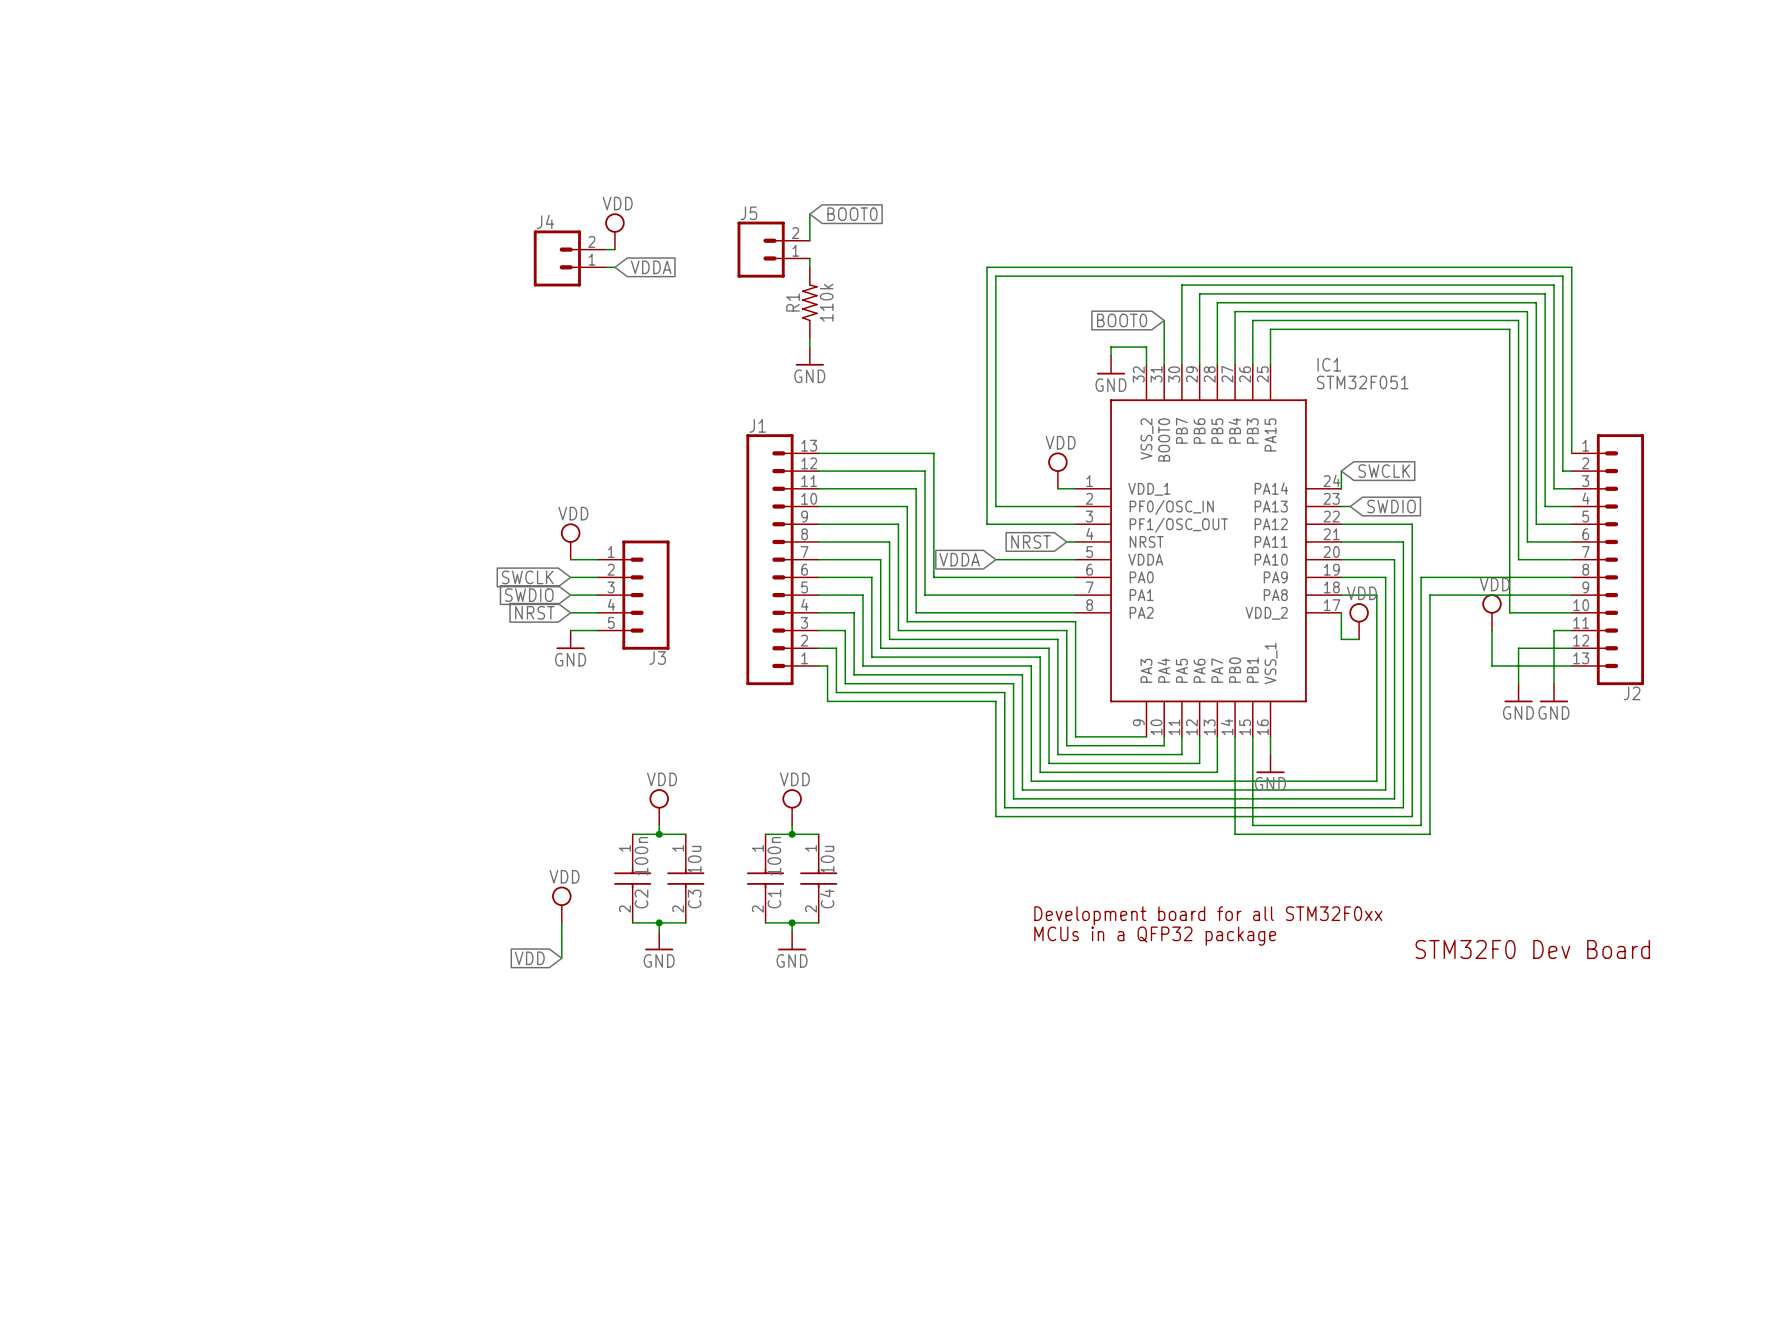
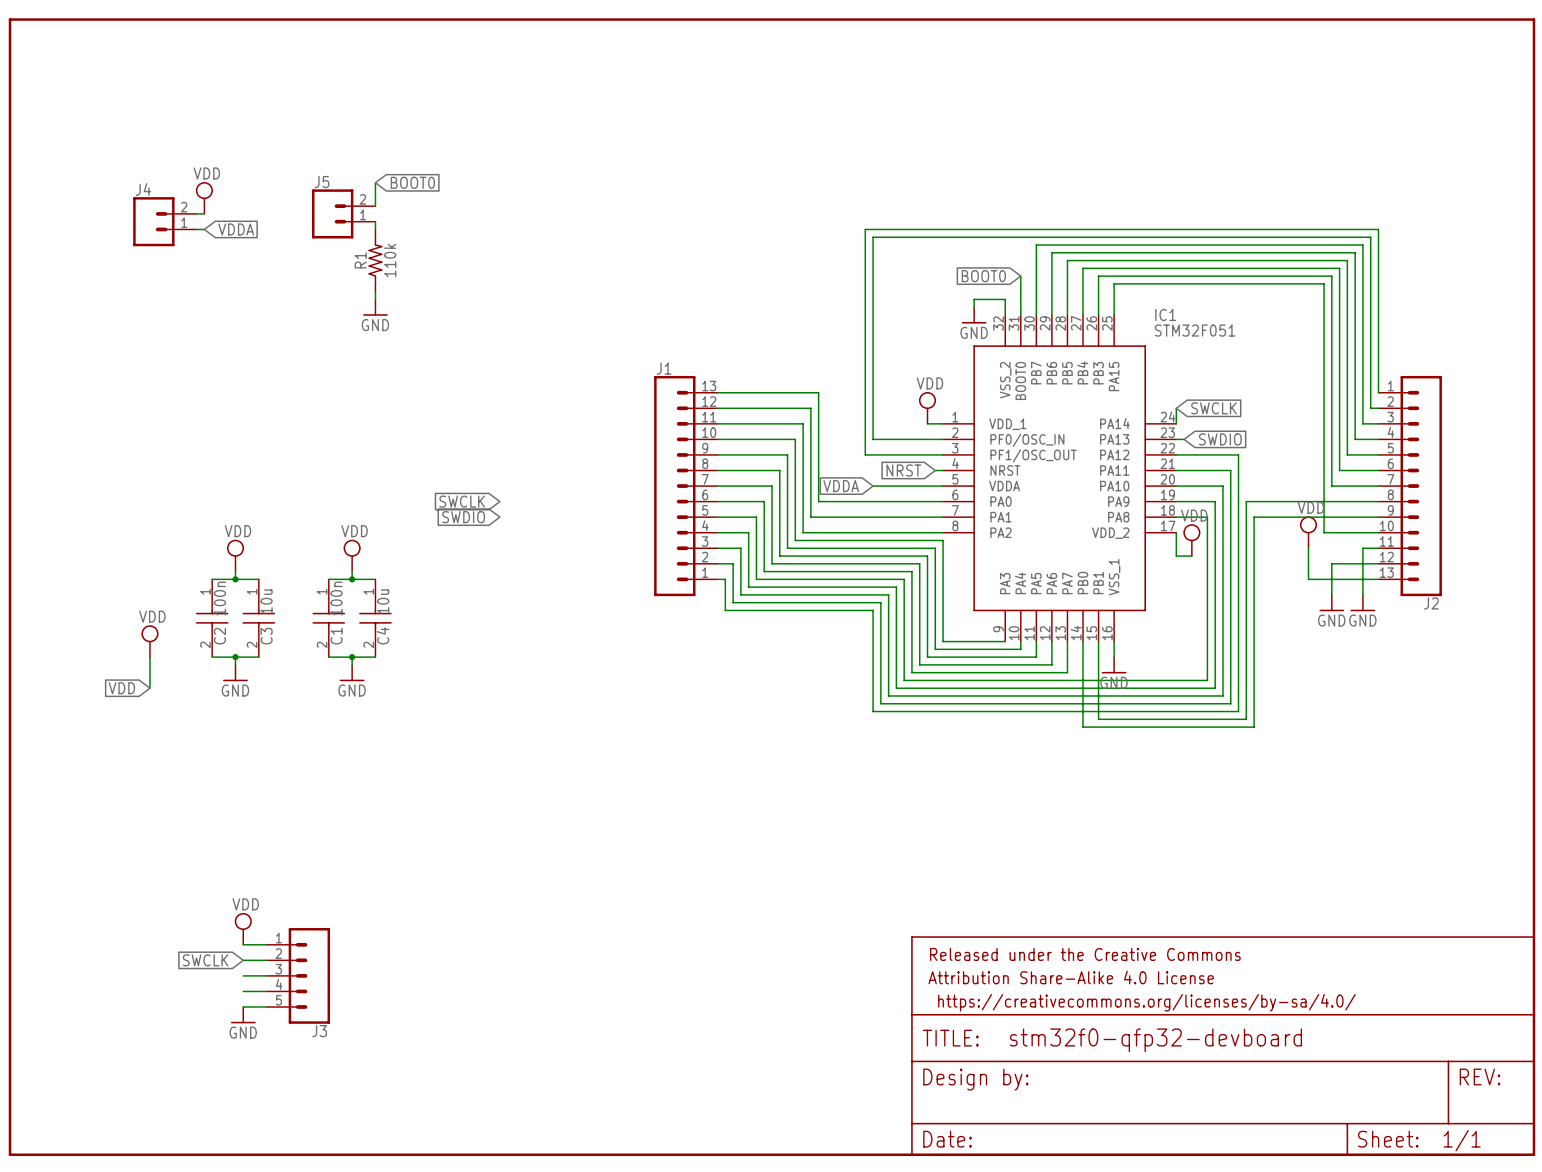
wire: none -> (375, 182) (375, 206)
global label: none -> BOOT0 (412, 182)
wire: (809, 214) (809, 240) -> none
global label: BOOT0 (852, 214) -> none
power symbol: none -> VDD (204, 197)
power symbol: VDD (614, 231) -> none
wire: none -> (196, 213) (204, 213)
wire: (606, 249) (614, 249) -> none
J5 position: (773, 249) -> (343, 213)
wire: none -> (375, 221) (375, 229)
J4 position: (569, 258) -> (164, 221)
wire: (809, 258) (809, 267) -> none
wire: none -> (196, 229) (204, 229)
global label: none -> VDDA (236, 229)
wire: (606, 267) (614, 267) -> none
global label: VDDA (651, 267) -> none
R1 position: (809, 302) -> (375, 260)
wire: none -> (375, 291) (375, 299)
wire: (809, 338) (809, 347) -> none
power symbol: none -> GND (375, 307)
power symbol: GND (809, 356) -> none
power symbol: VDD (570, 541) -> none
wire: (570, 559) (597, 559) -> none
wire: (570, 577) (597, 577) -> none
wire: (570, 595) (597, 595) -> none
J3 position: (633, 595) -> (298, 975)
global label: NRST (534, 612) -> none
wire: (570, 612) (597, 612) -> none
wire: (570, 630) (597, 630) -> none
power symbol: none -> VDD (235, 555)
power symbol: none -> VDD (352, 555)
power symbol: GND (570, 639) -> none
wire: none -> (235, 571) (235, 579)
wire: none -> (352, 571) (352, 579)
wire: none -> (212, 579) (258, 579)
junction: none -> (235, 579)
wire: none -> (328, 579) (375, 579)
junction: none -> (352, 579)
part: none -> (771, 587)
power symbol: none -> VDD (149, 641)
wire: none -> (149, 657) (149, 688)
wire: none -> (212, 657) (258, 657)
wire: none -> (235, 657) (235, 664)
junction: none -> (235, 657)
wire: none -> (328, 657) (375, 657)
wire: none -> (352, 657) (352, 664)
junction: none -> (352, 657)
power symbol: none -> GND (235, 673)
power symbol: none -> GND (352, 673)
global label: none -> VDD (121, 688)
power symbol: VDD (659, 807) -> none
power symbol: VDD (792, 807) -> none
wire: (659, 825) (659, 834) -> none
wire: (792, 825) (792, 834) -> none
wire: (632, 834) (685, 834) -> none
junction: (659, 834) -> none
wire: (765, 834) (818, 834) -> none
junction: (792, 834) -> none
C2 position: (632, 878) -> (212, 618)
C3 position: (685, 878) -> (258, 618)
C1 position: (765, 878) -> (328, 618)
C4 position: (818, 878) -> (375, 618)
power symbol: VDD (561, 904) -> none
text: Development board for all STM32F0xx (1208, 915) -> none
wire: (561, 922) (561, 958) -> none
wire: (632, 922) (685, 922) -> none
wire: (659, 922) (659, 931) -> none
junction: (659, 922) -> none
wire: (765, 922) (818, 922) -> none
wire: (792, 922) (792, 931) -> none
junction: (792, 922) -> none
text: MCUs in a QFP32 package (1155, 936) -> none
power symbol: GND (659, 941) -> none
power symbol: GND (792, 941) -> none
text: STM32F0 Dev Board (1532, 949) -> none
global label: VDD (529, 958) -> none
power symbol: none -> VDD (243, 928)
wire: none -> (243, 944) (266, 944)
global label: none -> SWCLK (205, 960)
wire: none -> (243, 960) (266, 960)
wire: none -> (243, 975) (266, 975)
wire: none -> (243, 991) (266, 991)
wire: none -> (243, 1007) (266, 1007)
power symbol: none -> GND (243, 1015)
part: none -> (1222, 1045)

